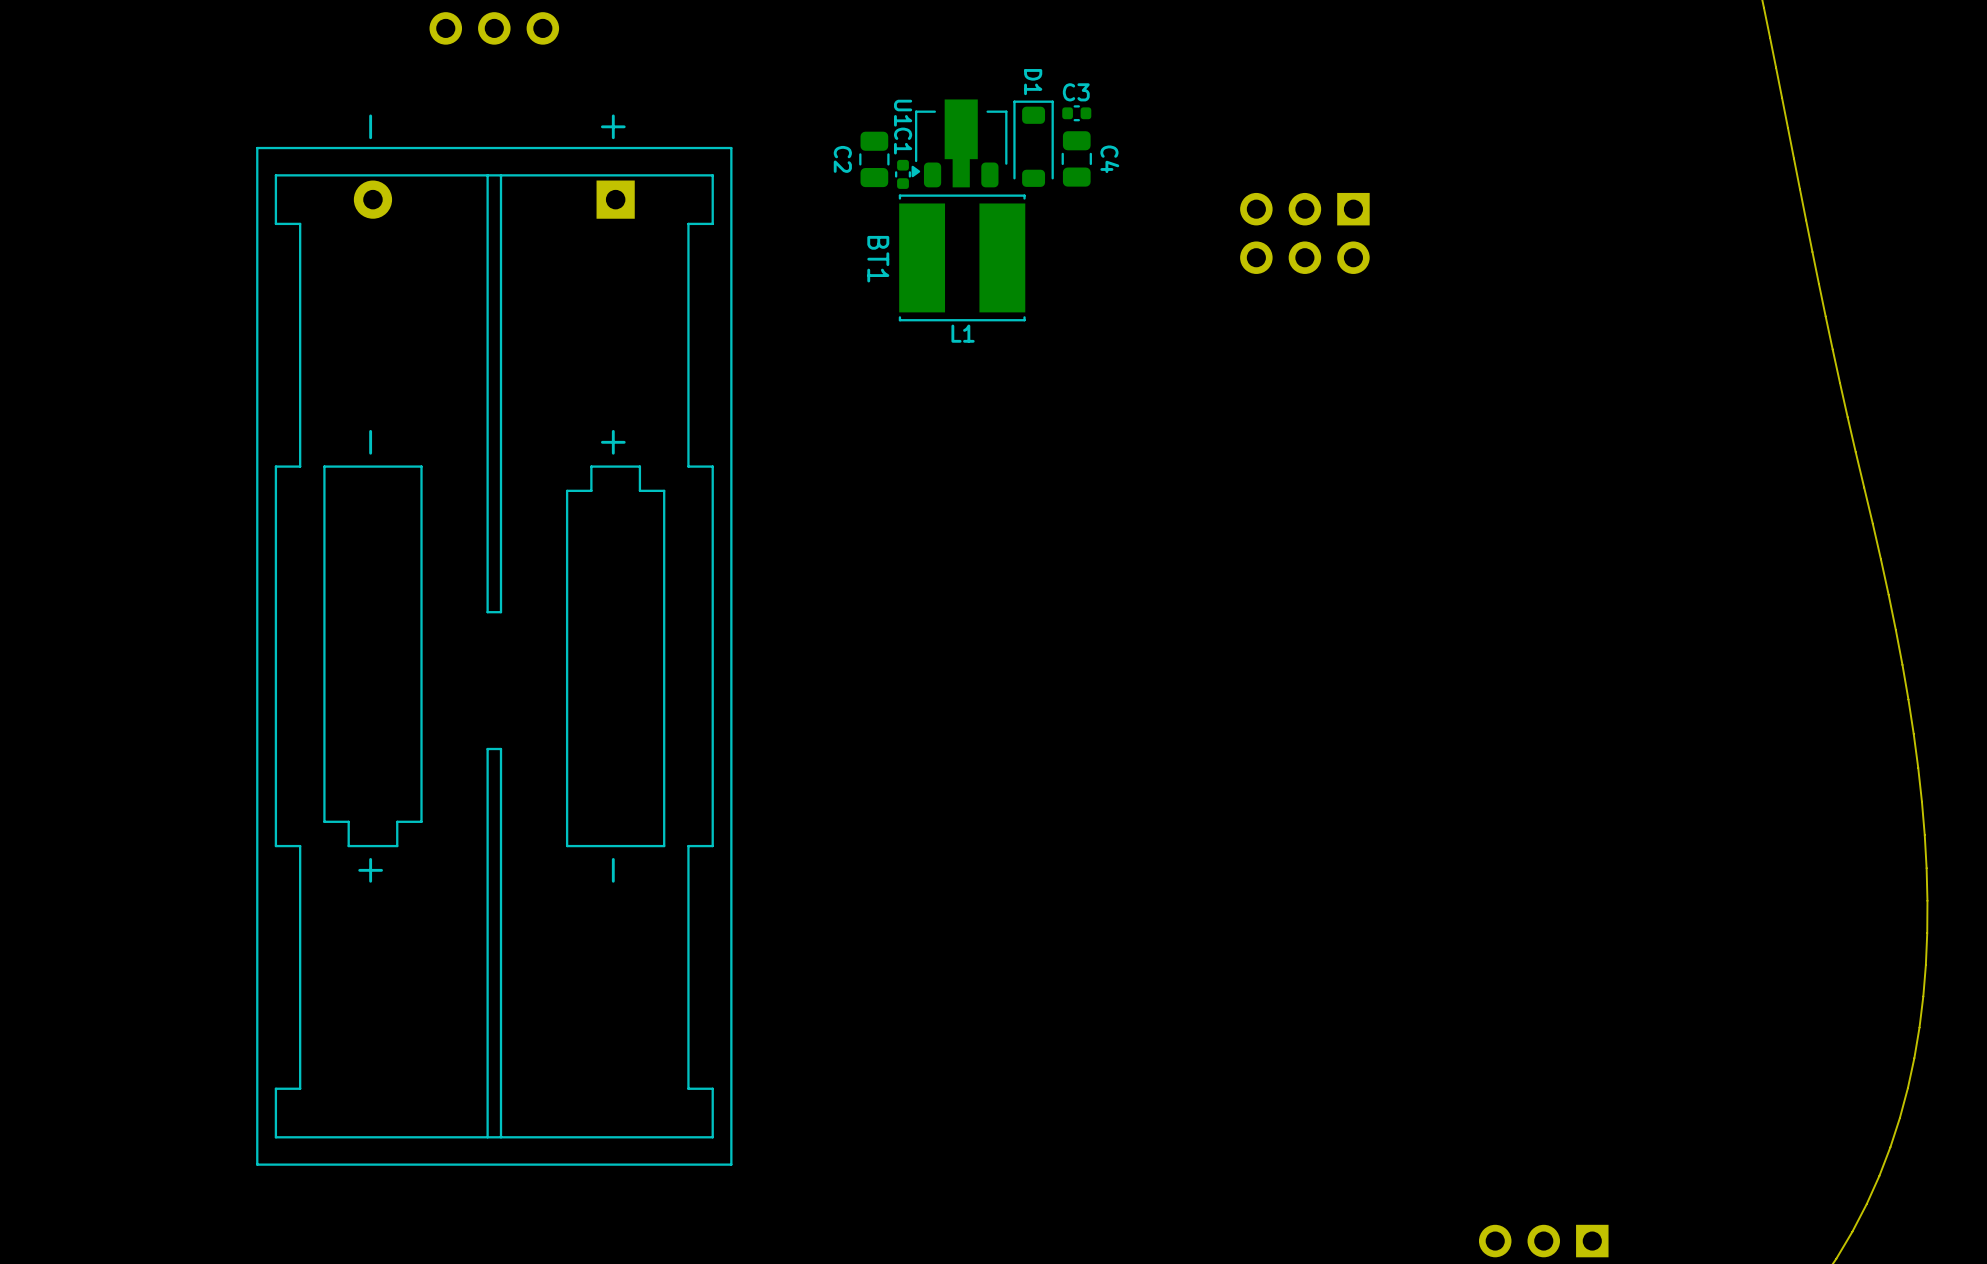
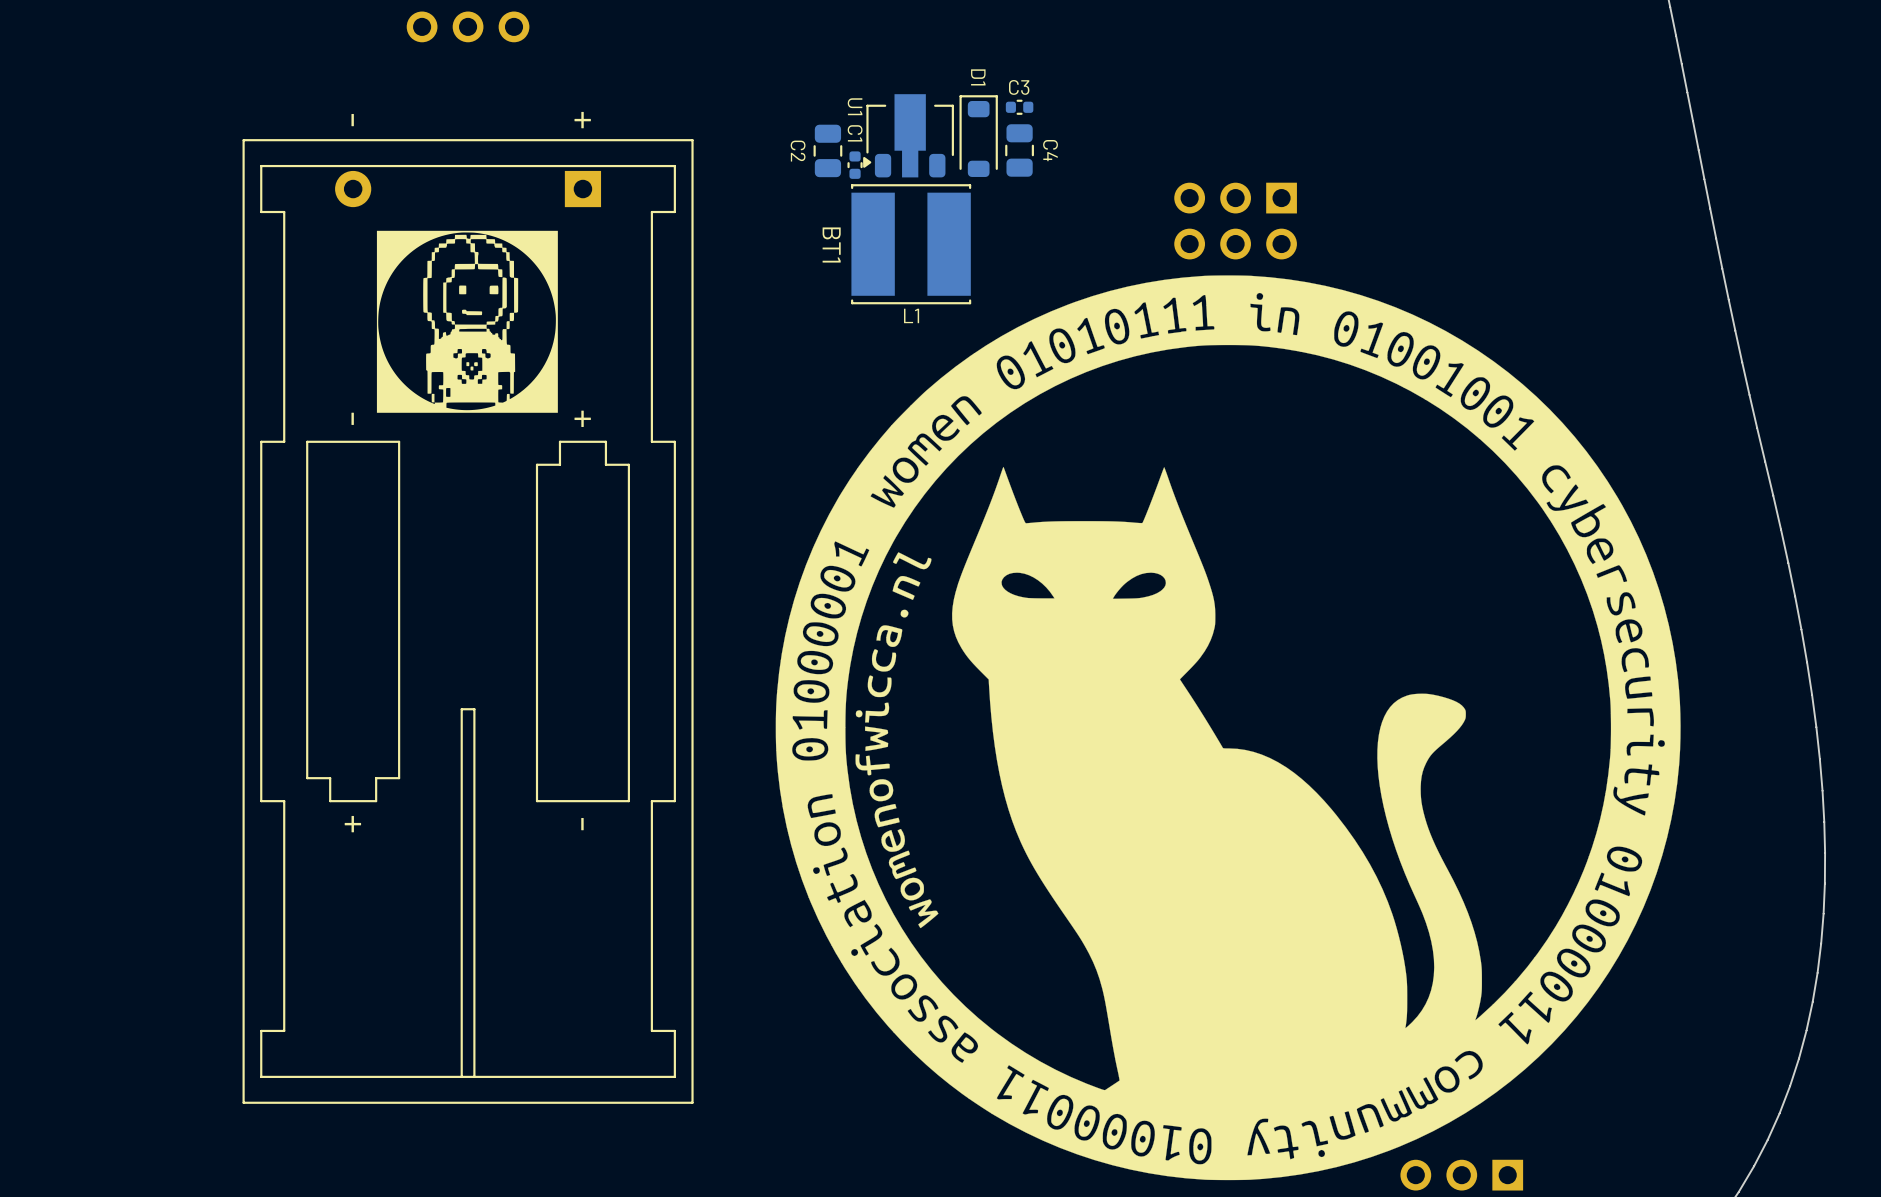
BT1 footprint: [256, 146, 733, 1166] -> [242, 139, 694, 1104]
drawing: none -> [376, 230, 558, 413]
drawing: none -> [775, 275, 1681, 1181]

